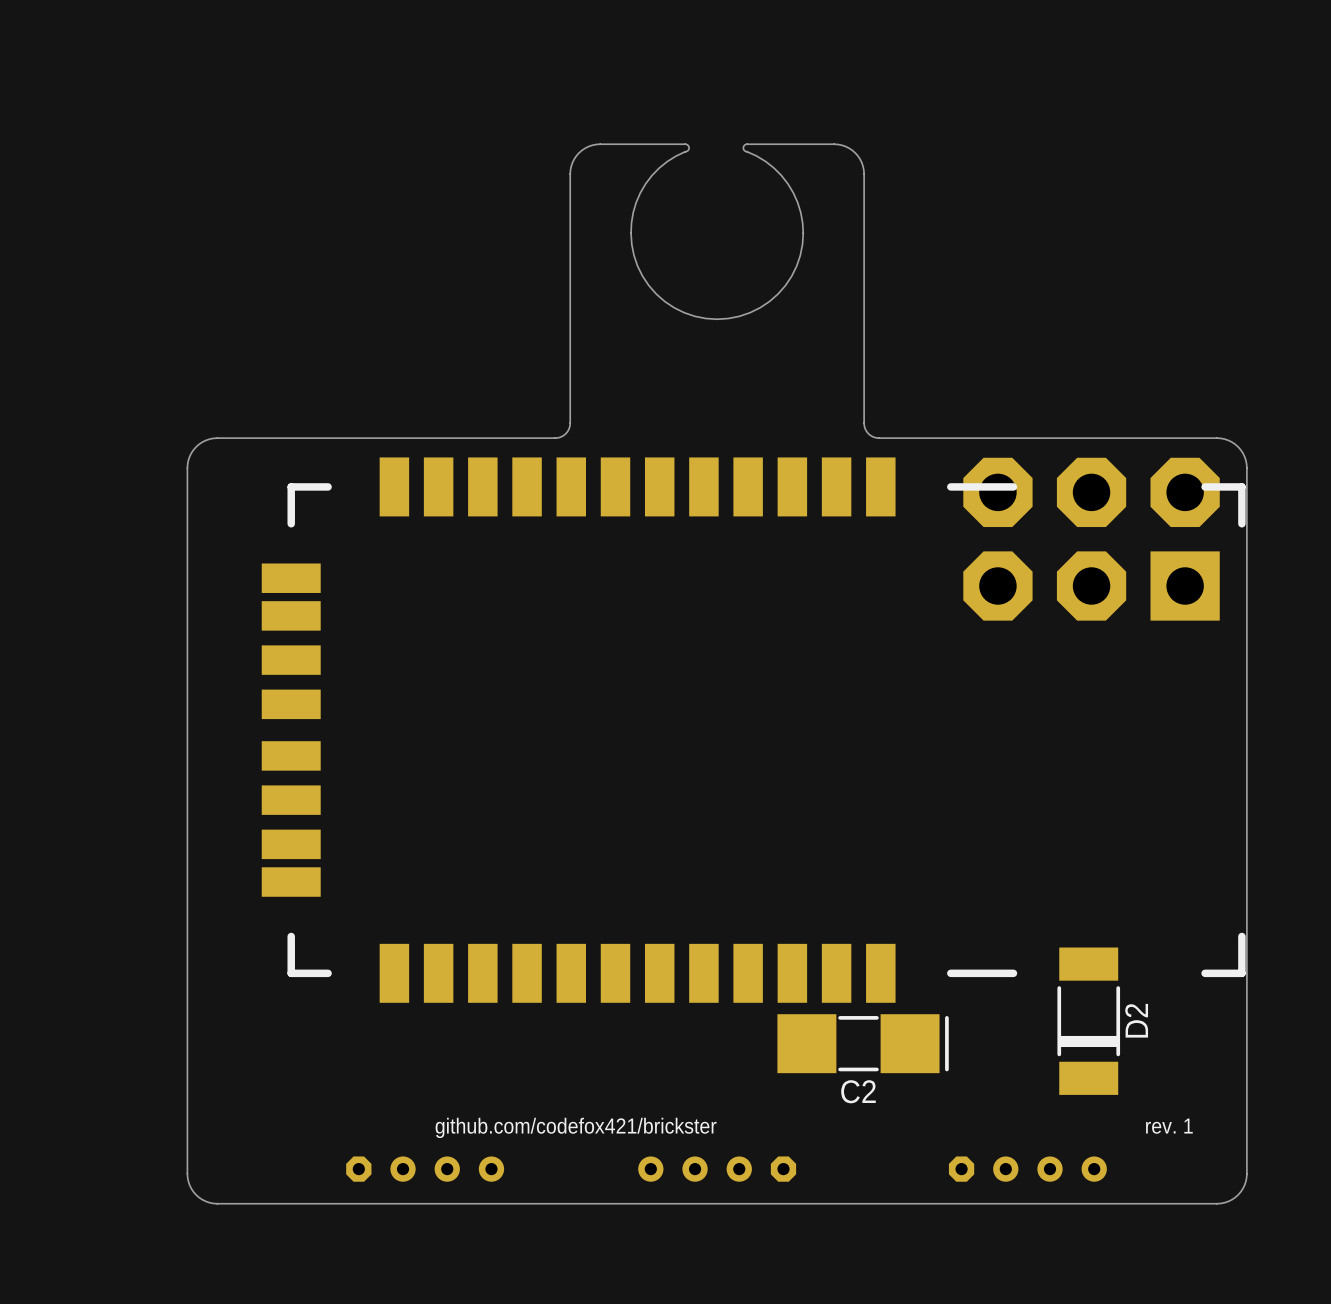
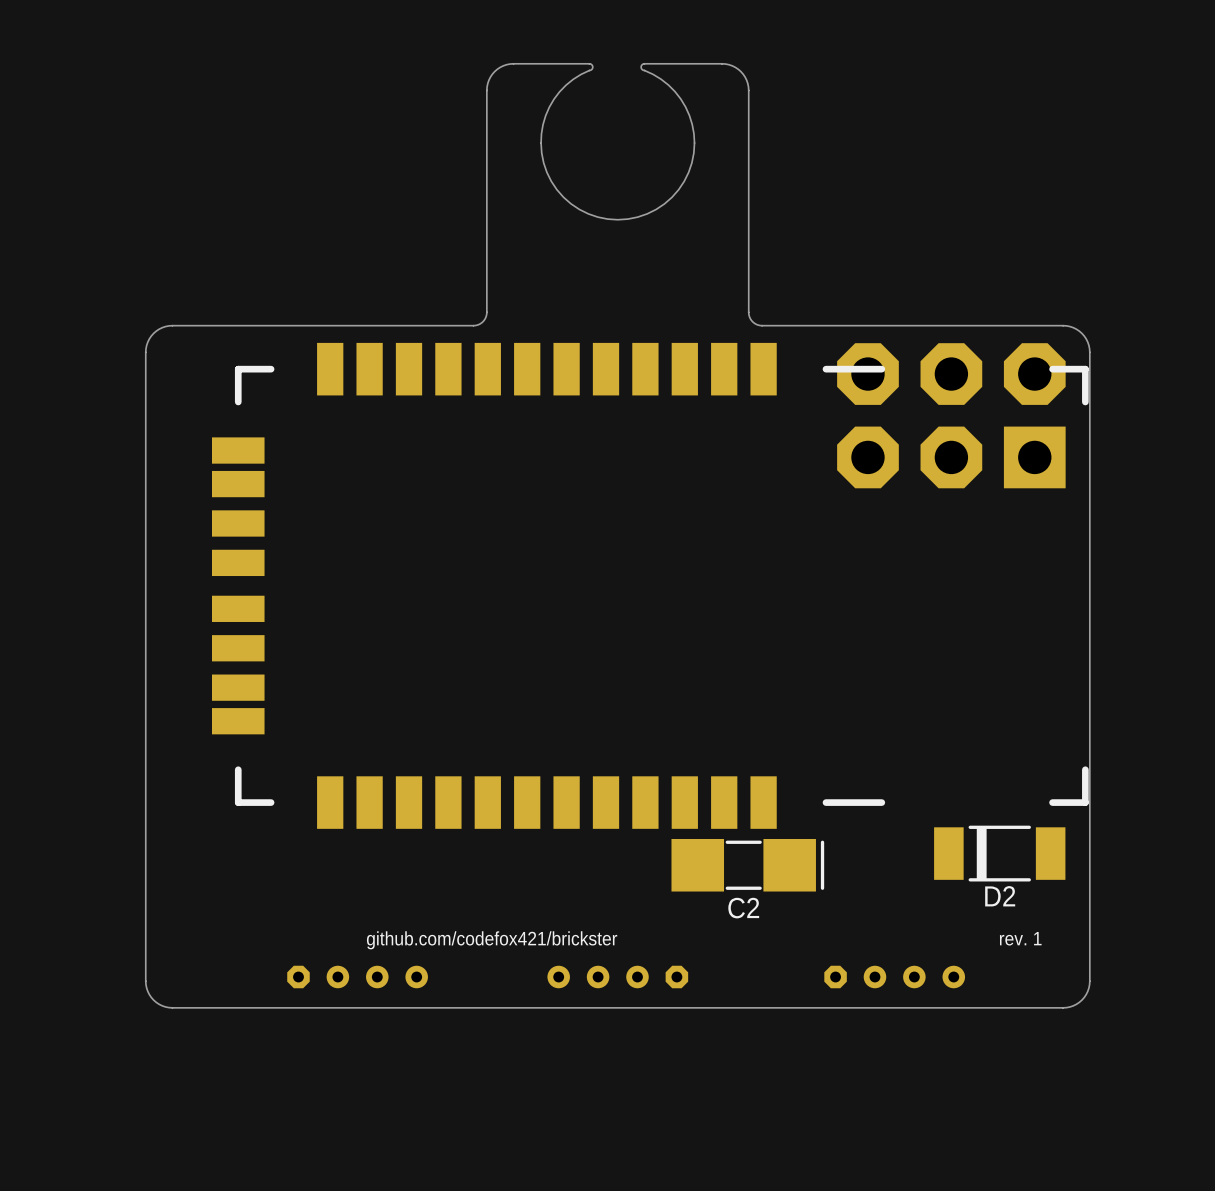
D2 rotation: 0° (1088, 1021) -> 90° clockwise (999, 853)

